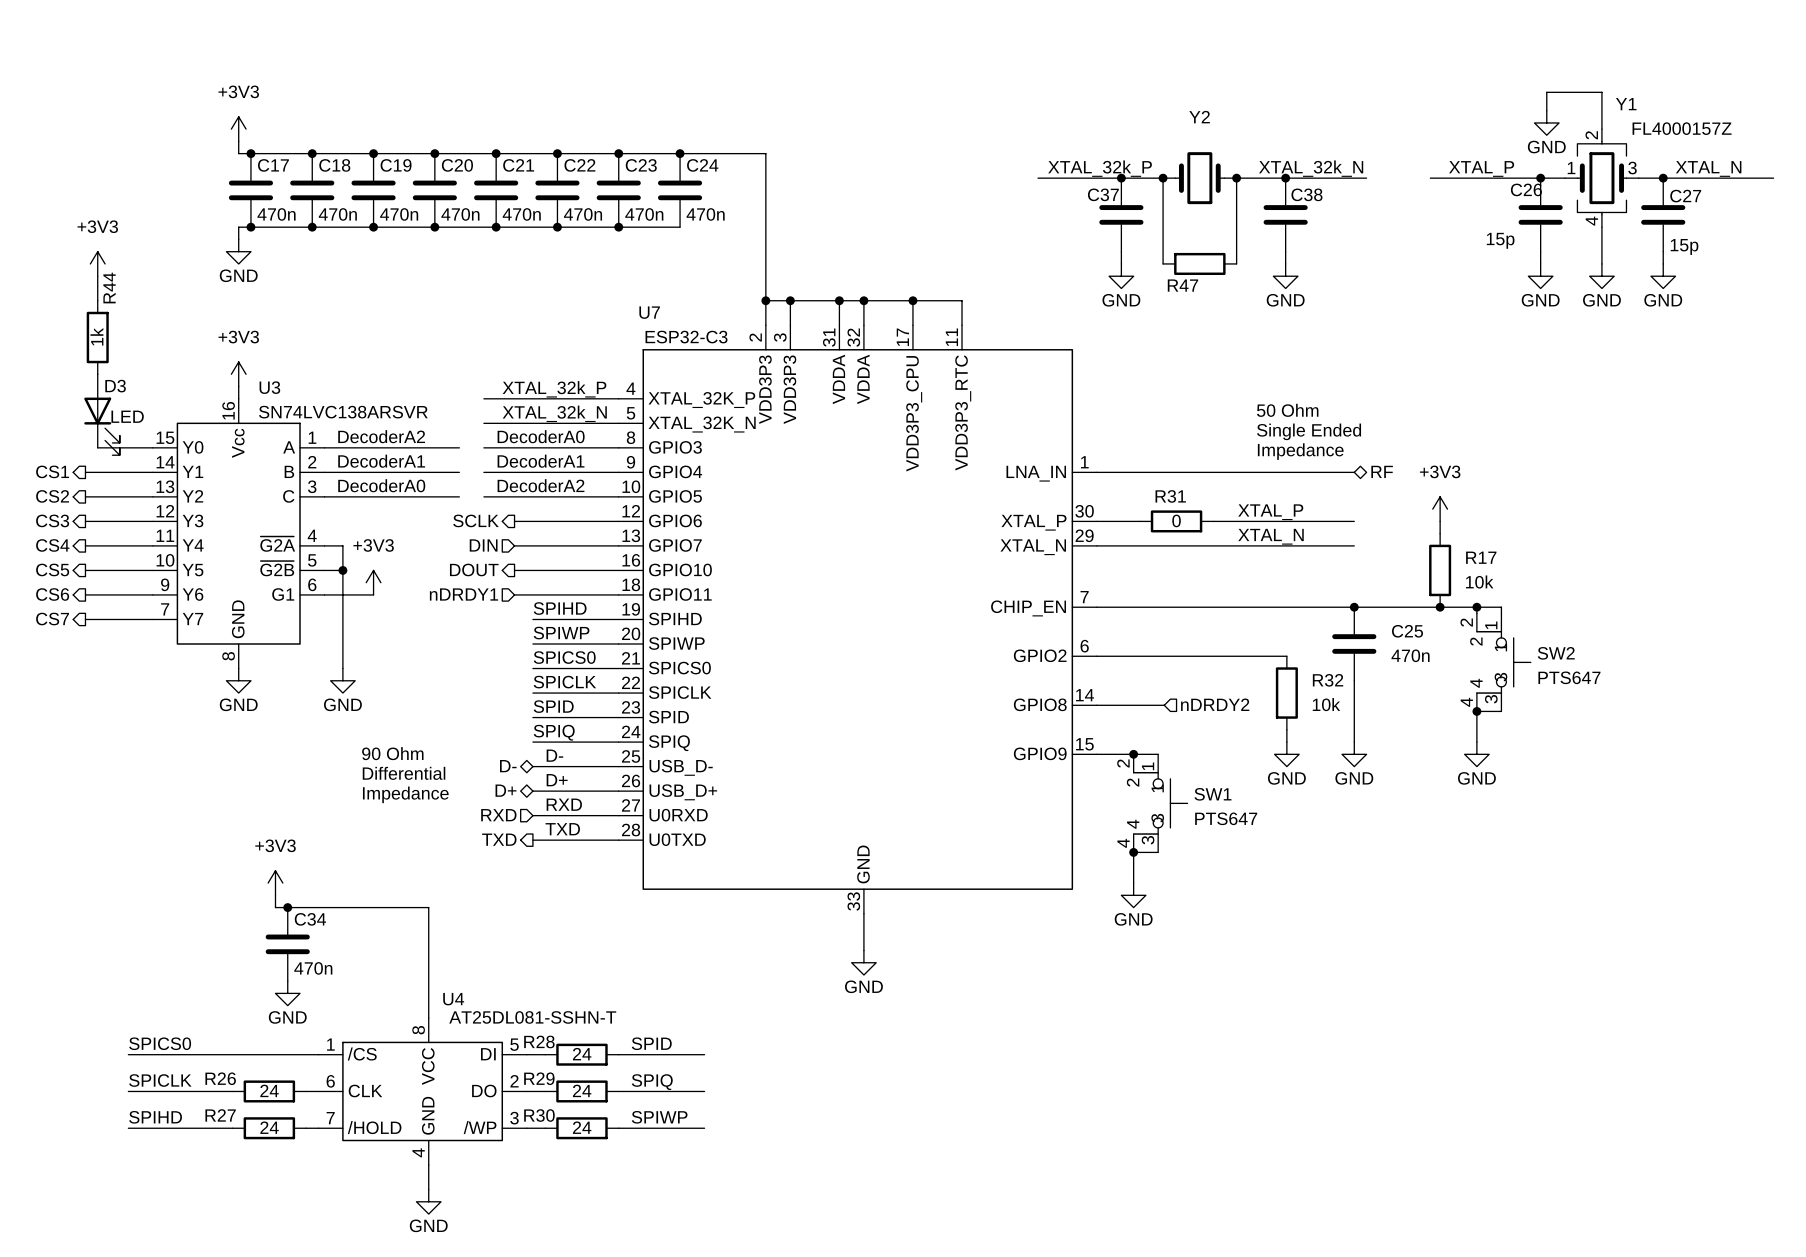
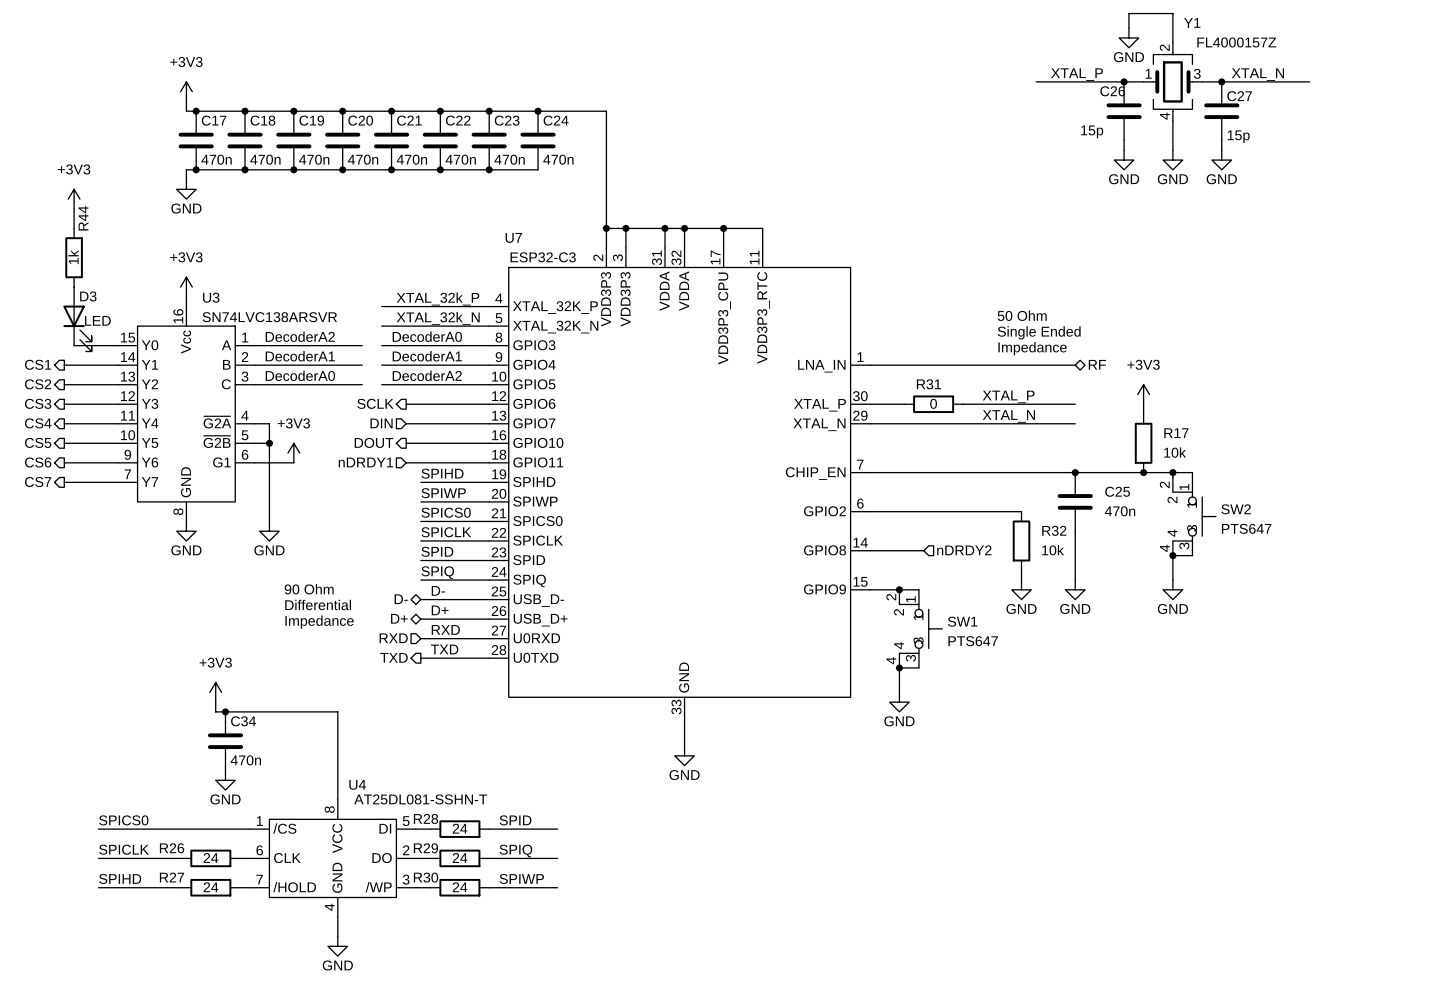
power symbol: none -> GND (1128, 37)
wire: (1546, 110) (1546, 92) (1601, 92) (1601, 129) -> (1128, 28) (1128, 13) (1172, 13) (1172, 42)
junction: none -> (1124, 81)
junction: none -> (1221, 81)
power symbol: GND (1546, 122) -> none
label: XTAL_32k_P (1100, 168) -> none
label: XTAL_32k_N (1311, 168) -> none
label position: XTAL_P (1481, 168) -> XTAL_P (1077, 74)
label position: XTAL_N (1708, 168) -> XTAL_N (1257, 74)
wire: (1038, 178) (1163, 178) (1163, 263) -> none
junction: (1121, 178) -> none
junction: (1163, 178) -> none
Y2: (1199, 178) -> none
junction: (1236, 178) -> none
junction: (1285, 178) -> none
wire: (1366, 178) (1236, 178) (1236, 263) -> none
wire: (1430, 178) (1565, 178) -> (1036, 81) (1143, 81)
junction: (1540, 178) -> none
Y1 position: (1601, 178) -> (1172, 81)
wire: (1638, 178) (1773, 178) -> (1202, 81) (1309, 81)
junction: (1663, 178) -> none
C37: (1121, 214) -> none
C38: (1285, 214) -> none
power symbol: none -> GND (1124, 160)
power symbol: none -> GND (1172, 160)
power symbol: none -> GND (1221, 160)
C26 position: (1540, 214) -> (1124, 111)
C27 position: (1663, 214) -> (1221, 111)
wire: (1601, 227) (1601, 263) -> (1172, 120) (1172, 150)
wire: (1121, 251) (1121, 263) -> none
wire: (1285, 251) (1285, 263) -> none
wire: (1540, 251) (1540, 263) -> (1124, 140) (1124, 150)
wire: (1663, 251) (1663, 263) -> (1221, 140) (1221, 150)
R47: (1199, 263) -> none
power symbol: GND (1121, 276) -> none
power symbol: GND (1285, 276) -> none
power symbol: GND (1540, 276) -> none
power symbol: GND (1601, 276) -> none
power symbol: GND (1663, 276) -> none

